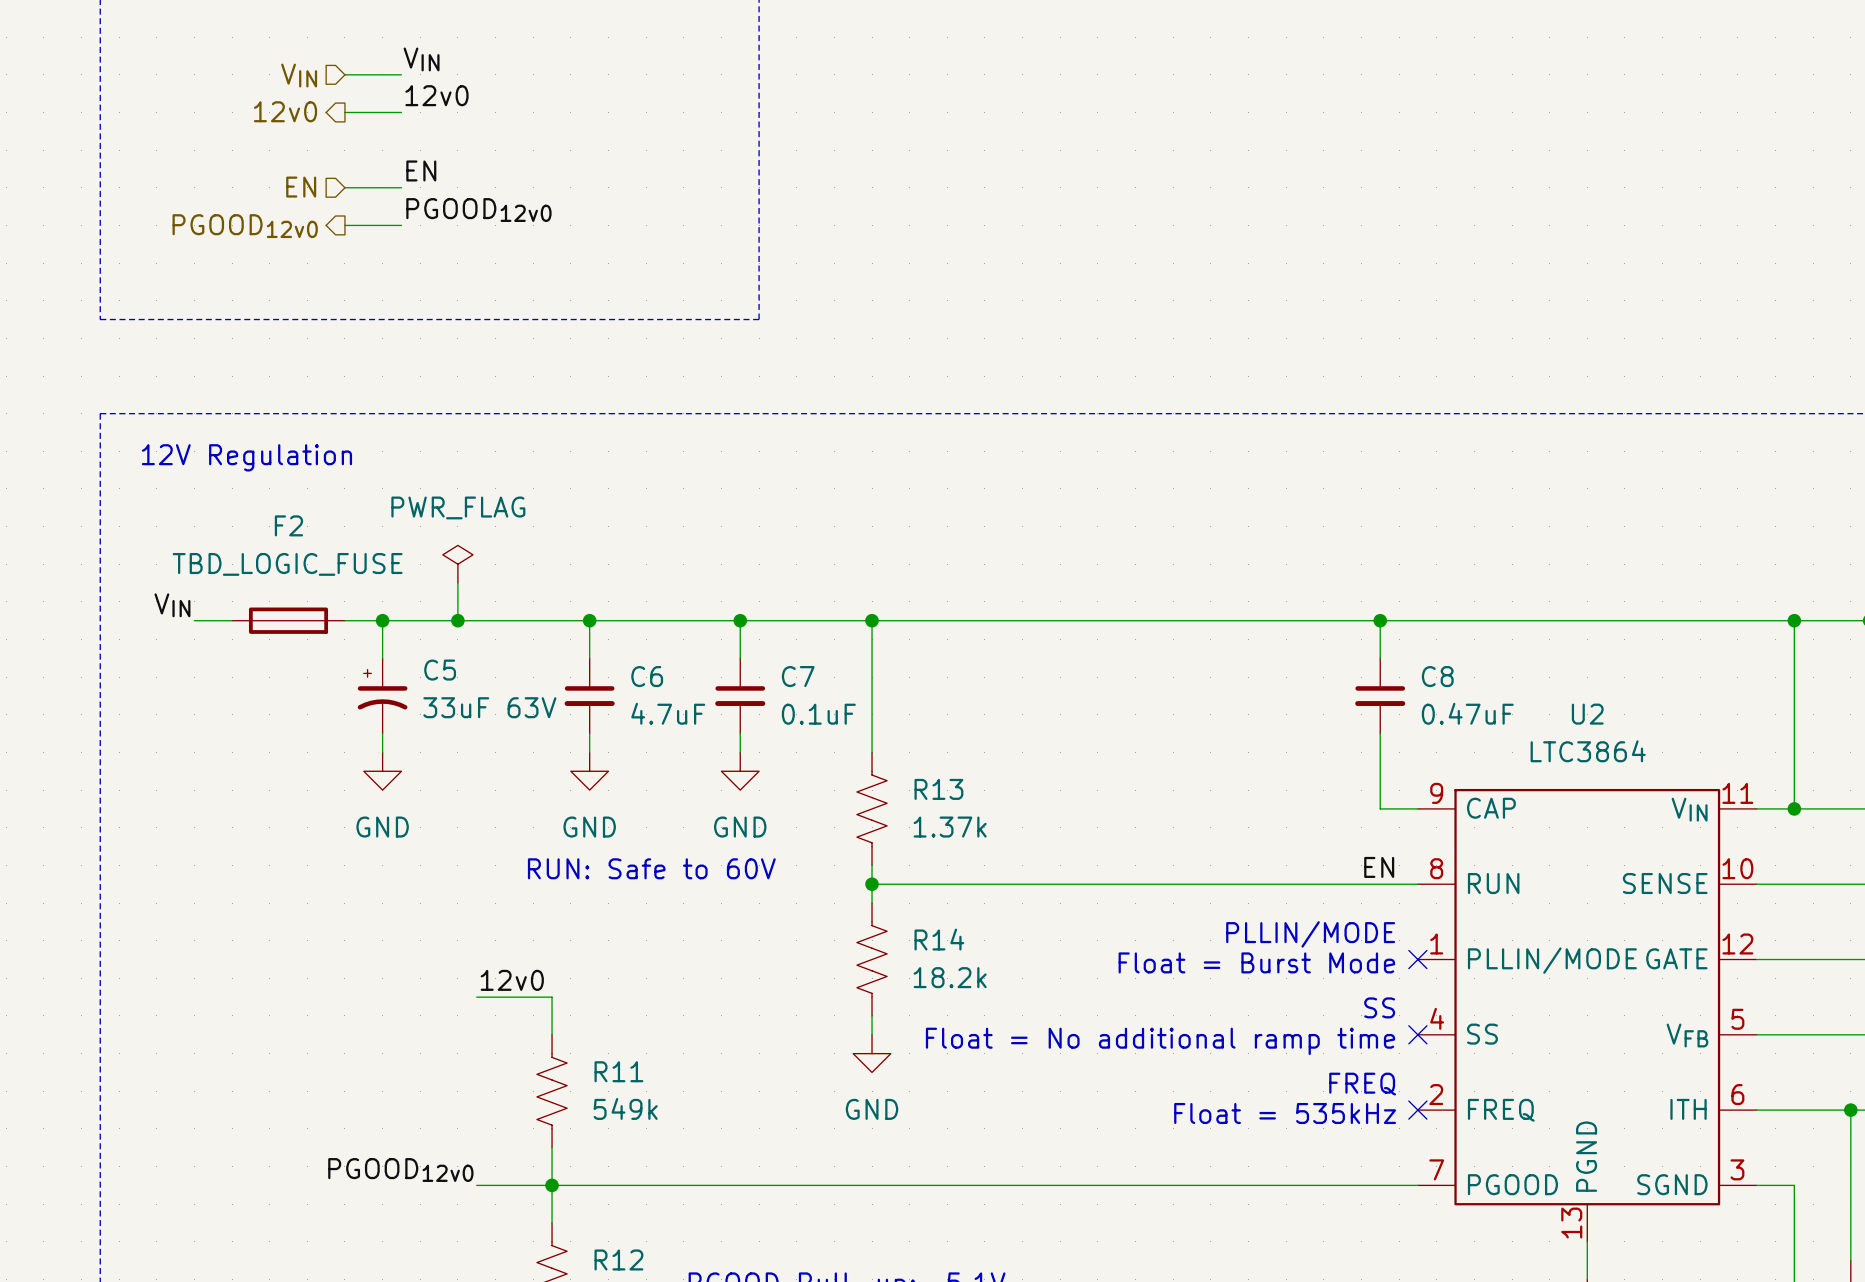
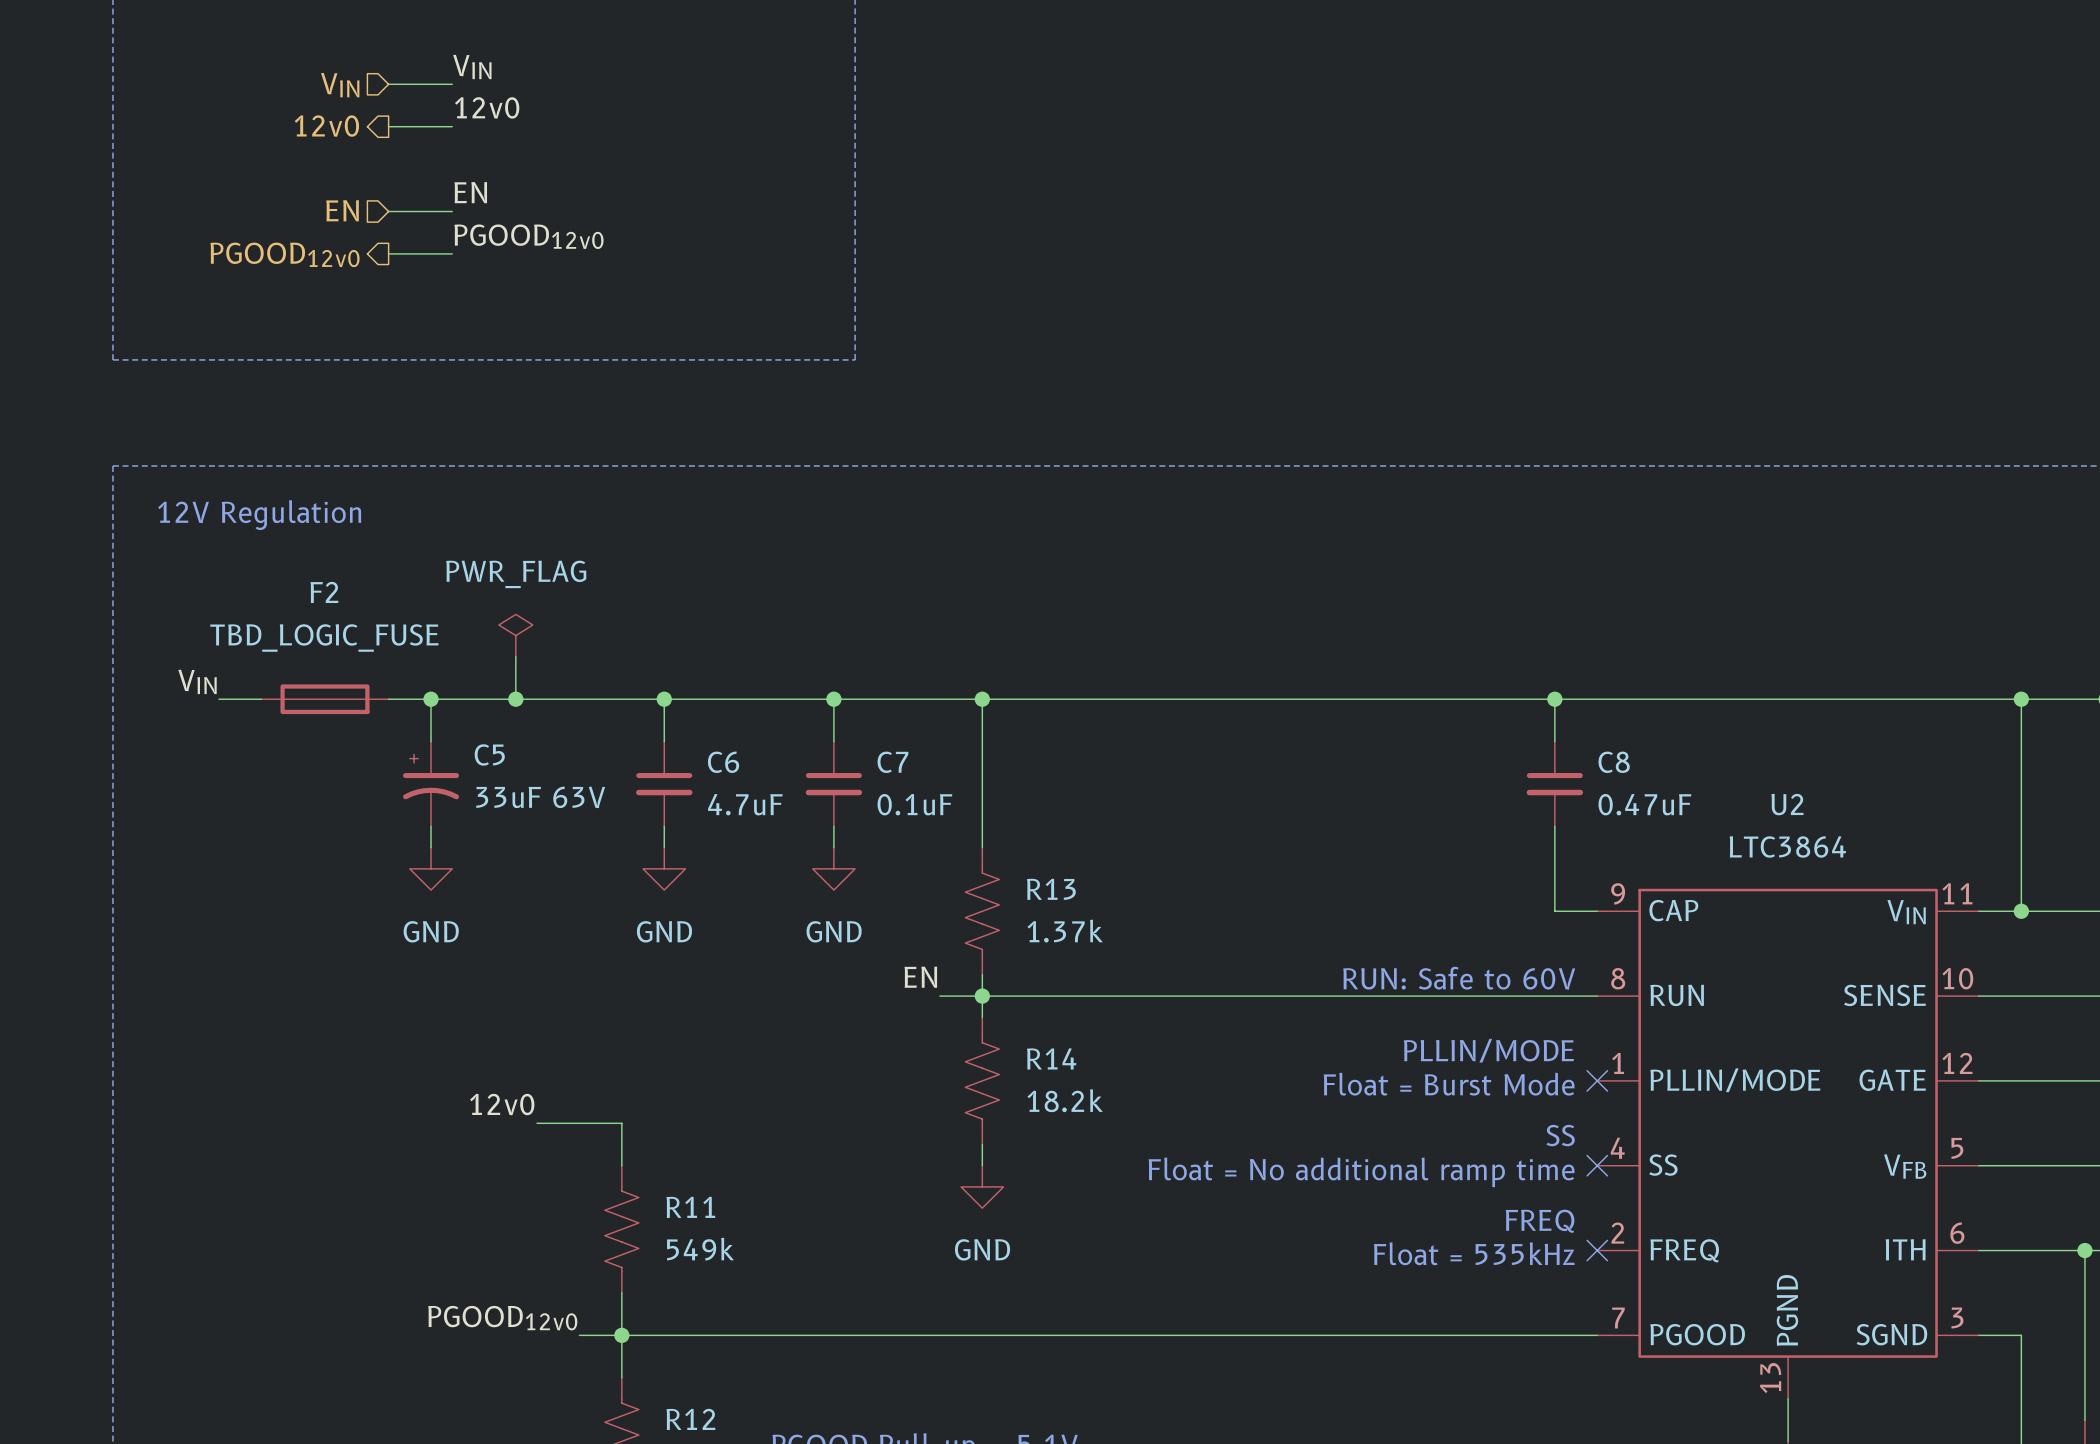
label: none -> EN (920, 977)
label: EN (1379, 867) -> none
text: RUN: Safe to 60V (651, 868) -> none
text: none -> RUN: Safe to 60V (1459, 978)
wire: none -> (939, 996) (982, 996)
label position: 12v0 (512, 980) -> 12v0 (502, 1104)
label position: PGOOD12v0 (400, 1170) -> PGOOD12v0 (502, 1318)
wire: (476, 1185) (514, 1185) -> none

